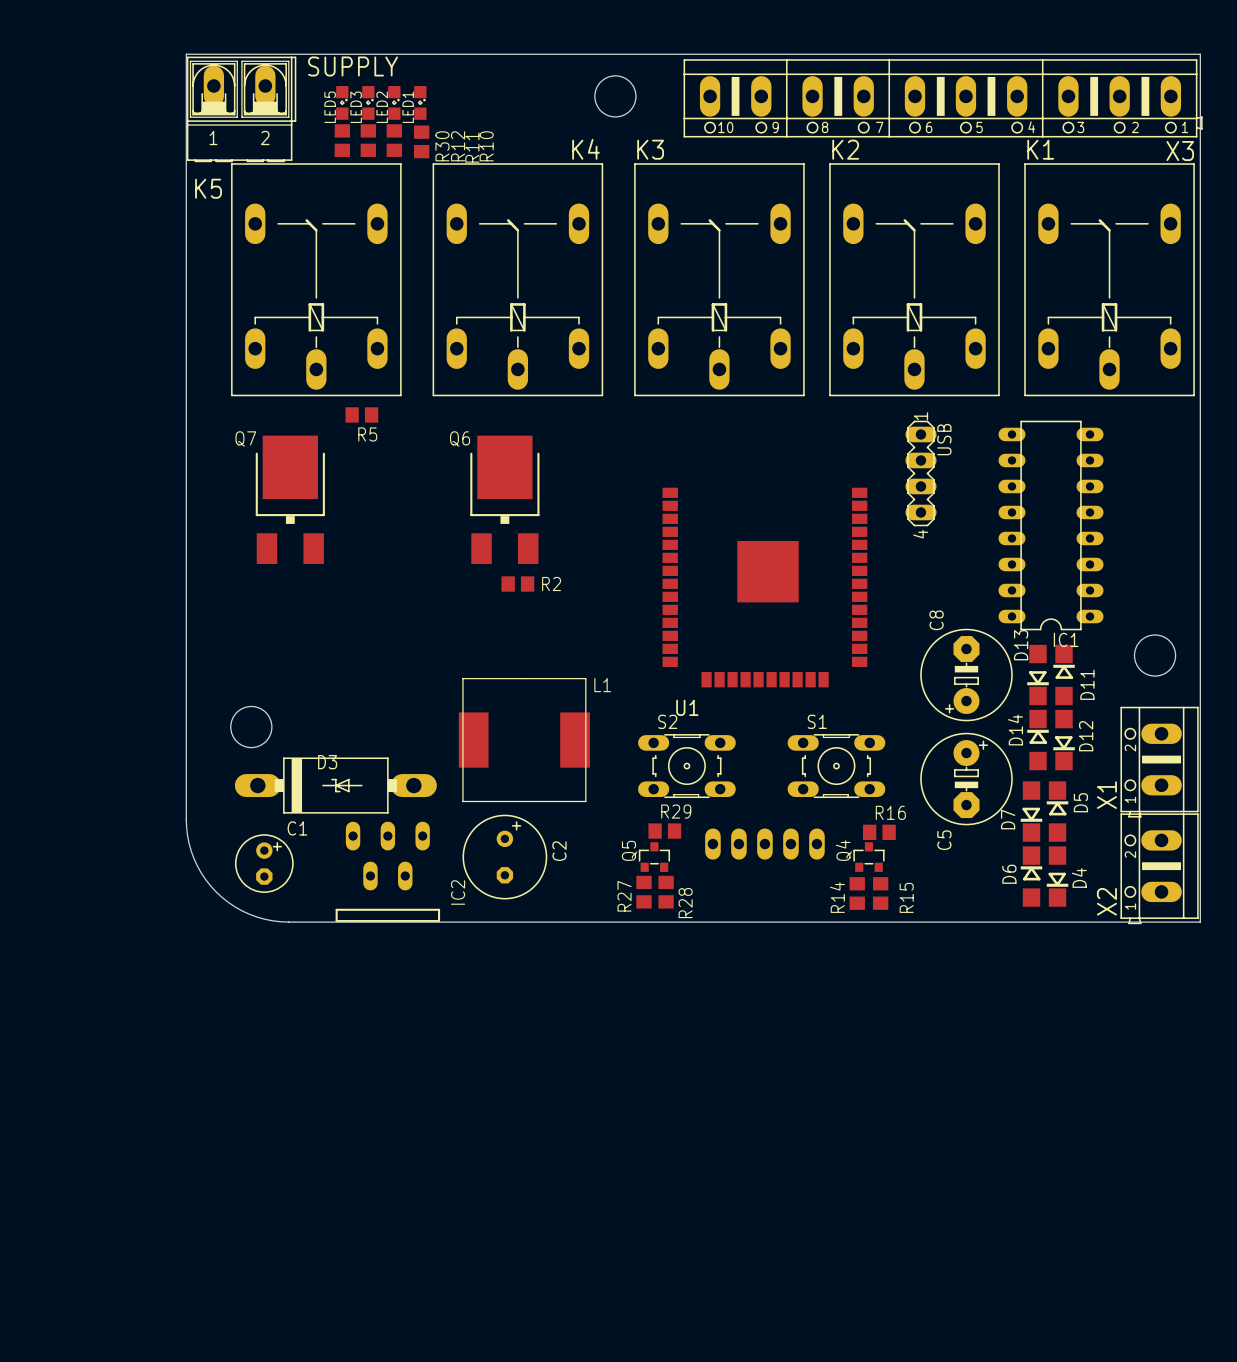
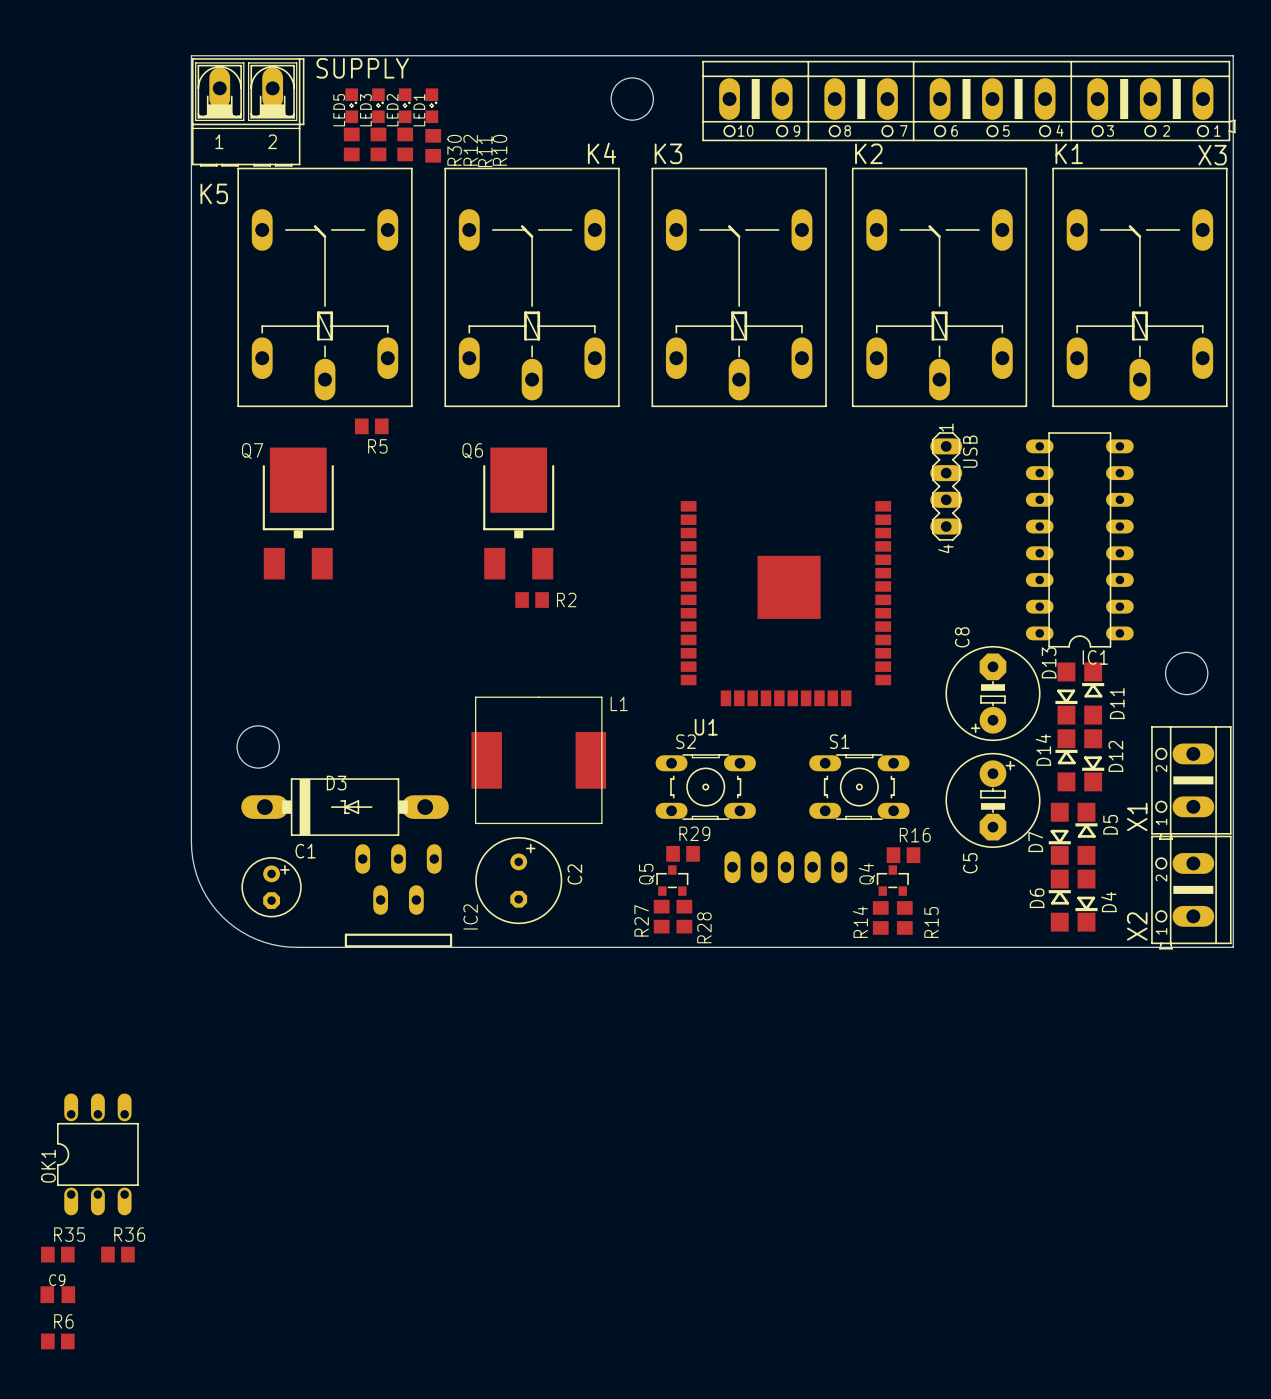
OK1: none -> (97, 1154)
R35: none -> (57, 1254)
R36: none -> (117, 1254)
C9: none -> (57, 1294)
R6: none -> (57, 1341)

